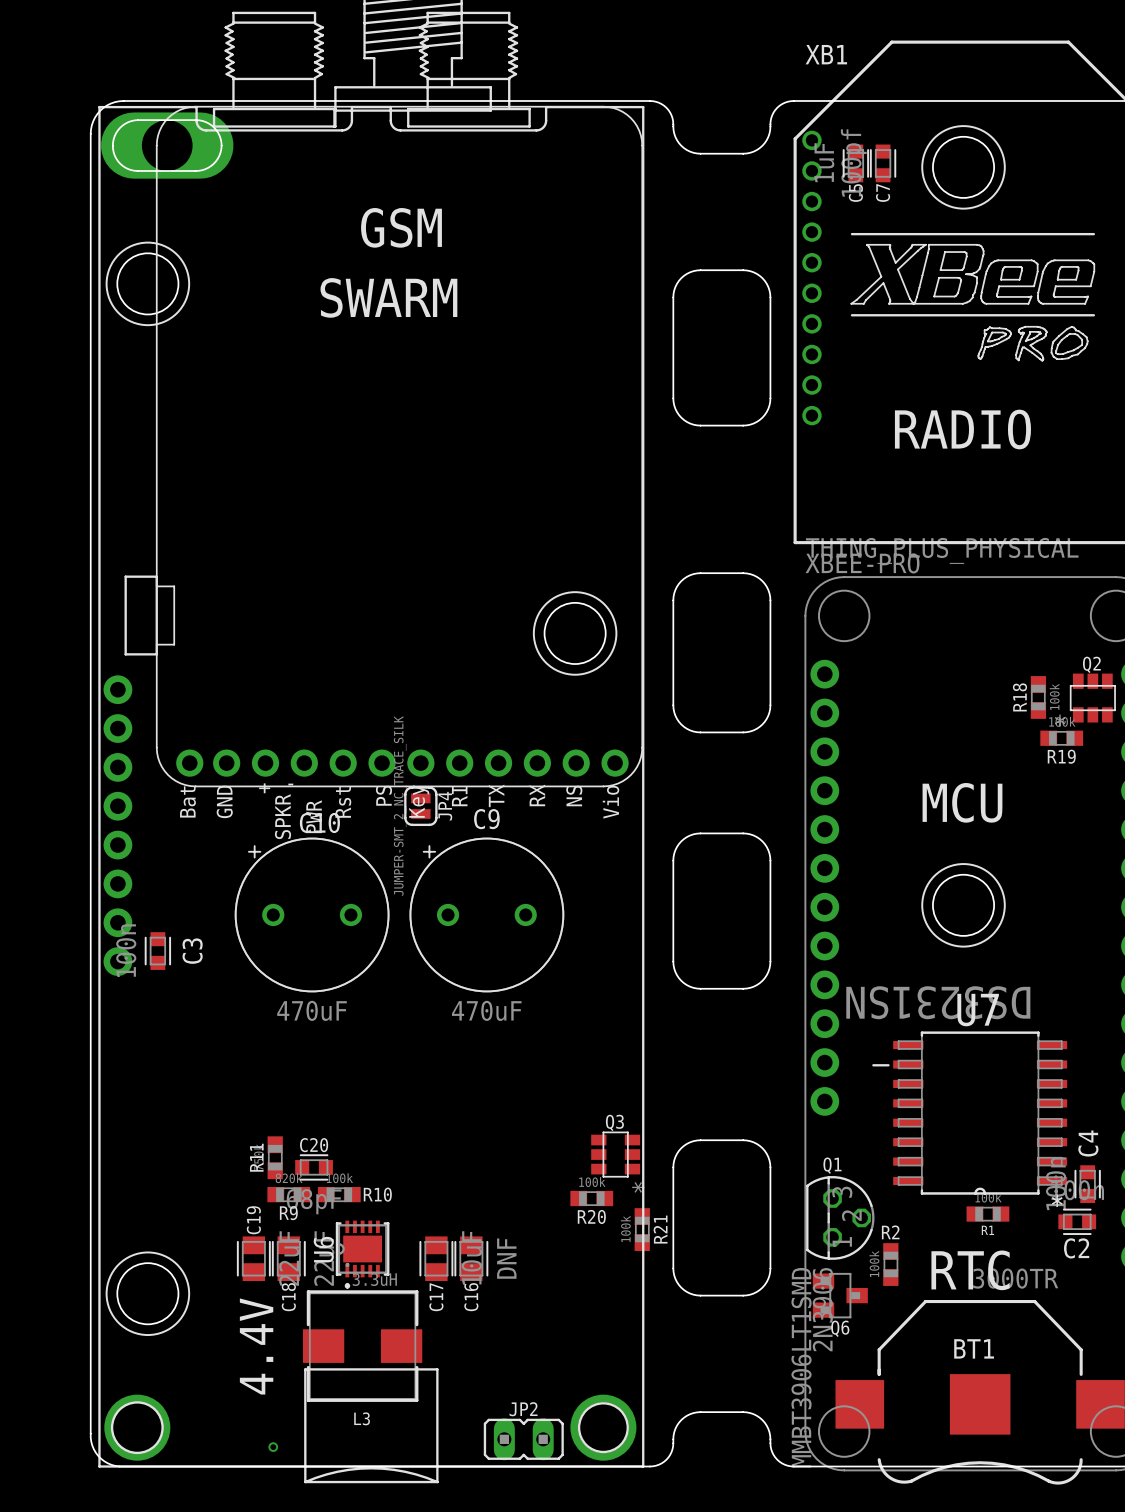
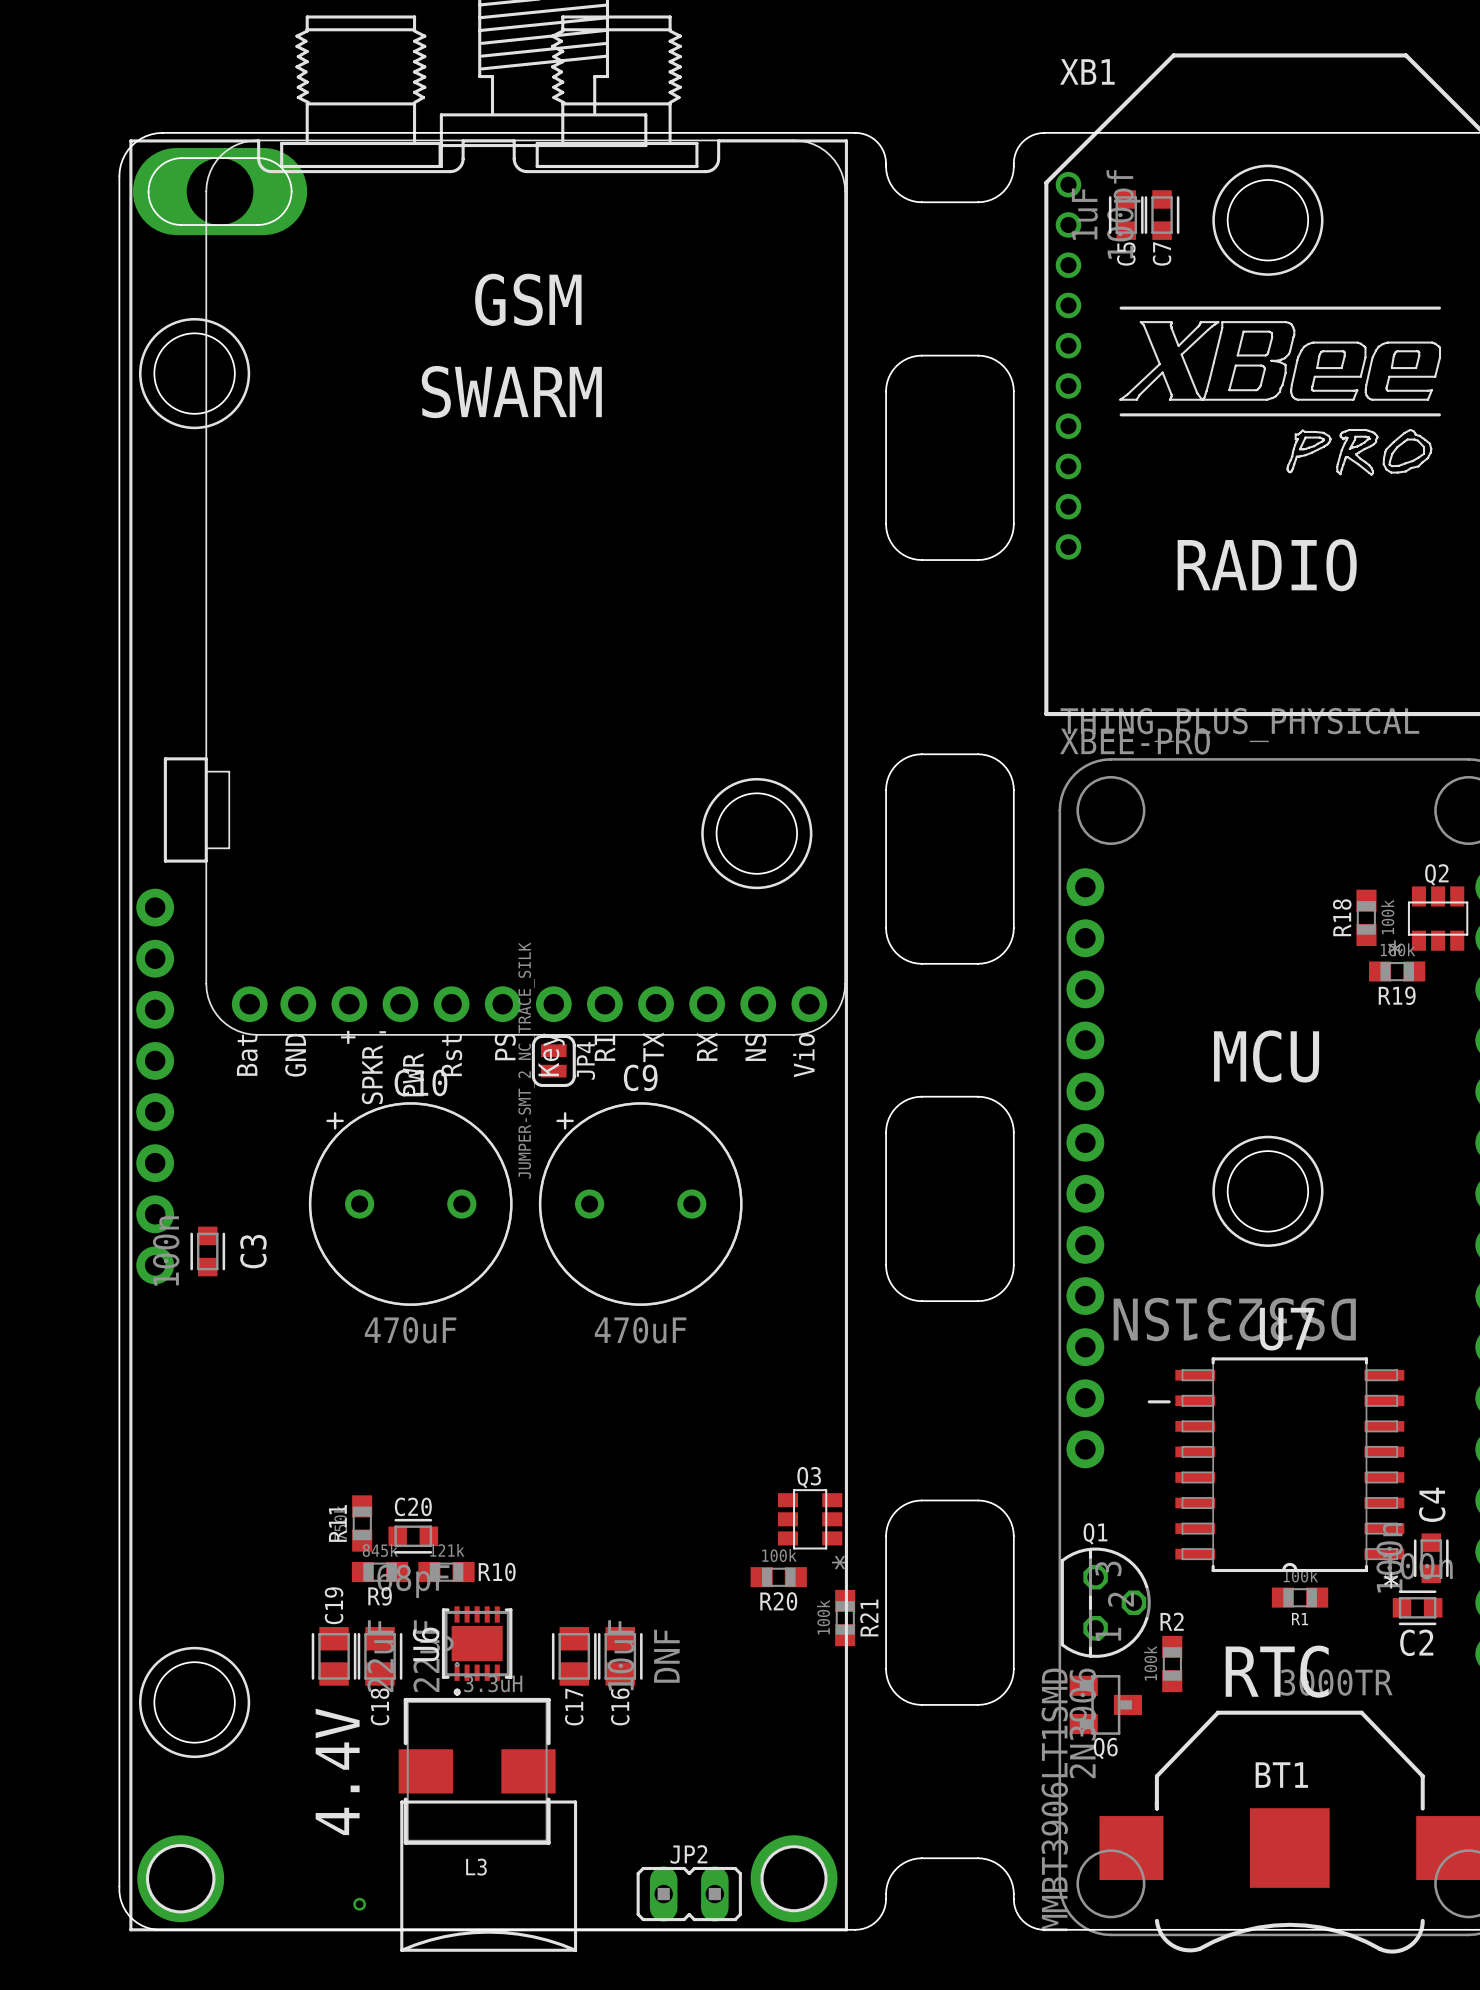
R9 value: 820k (289, 1178) -> 845k (380, 1550)
R10 value: 100k (339, 1178) -> 121k (447, 1550)

